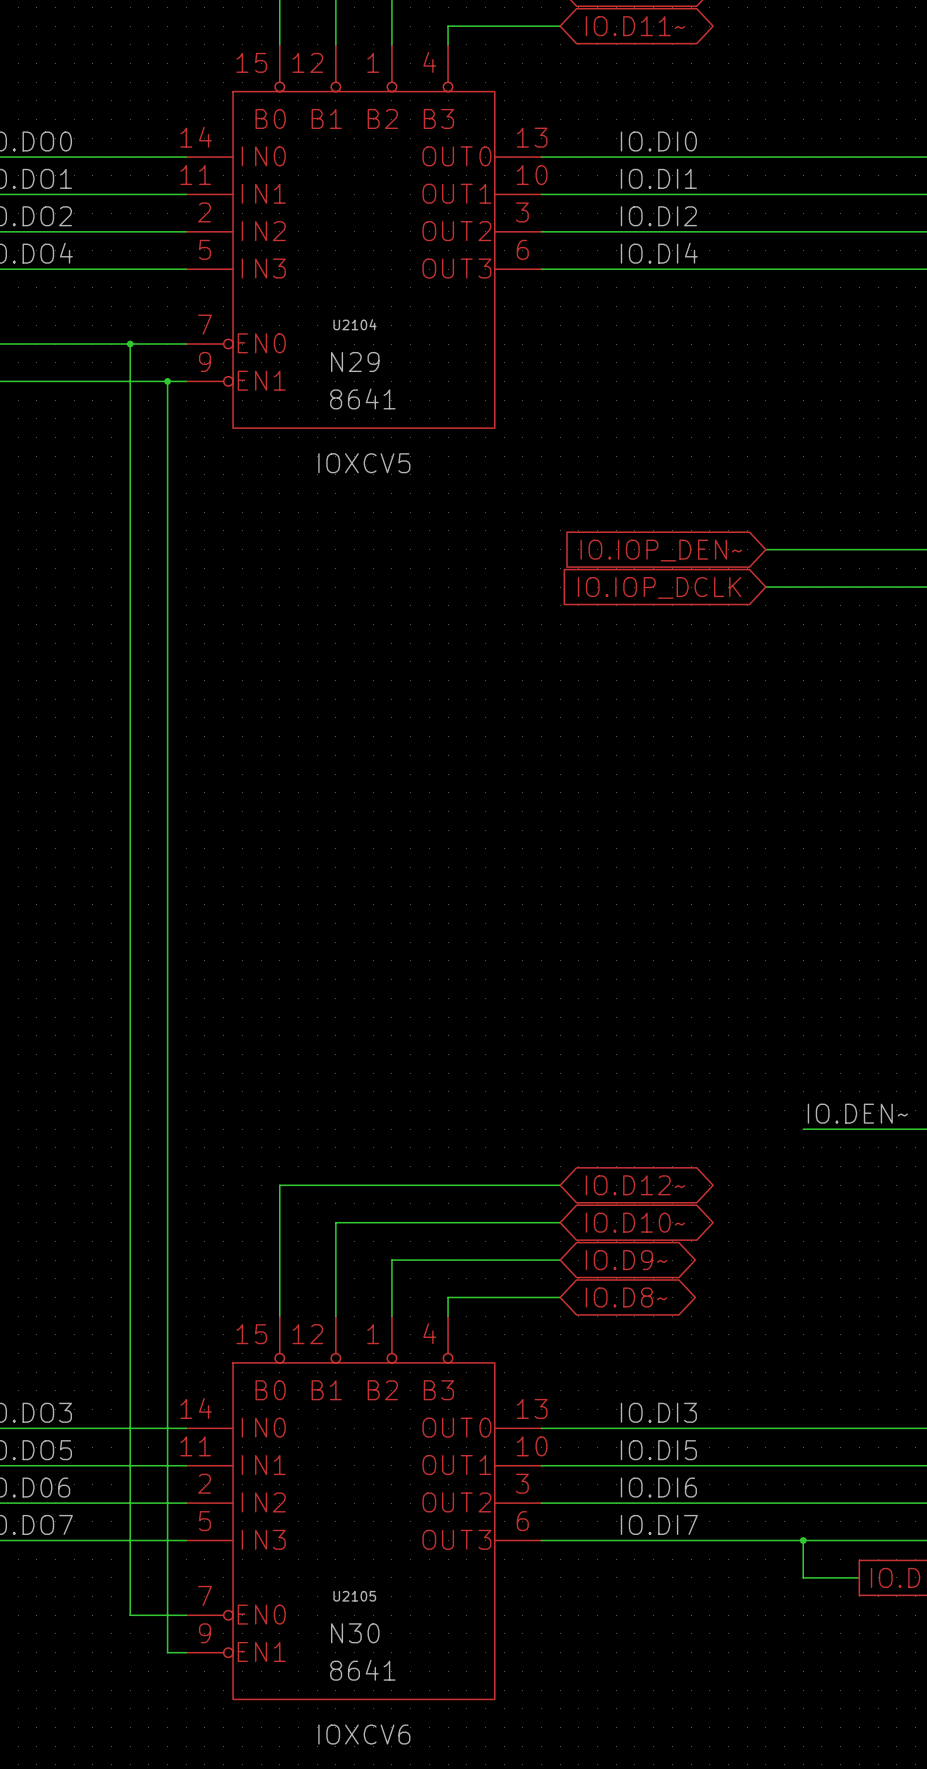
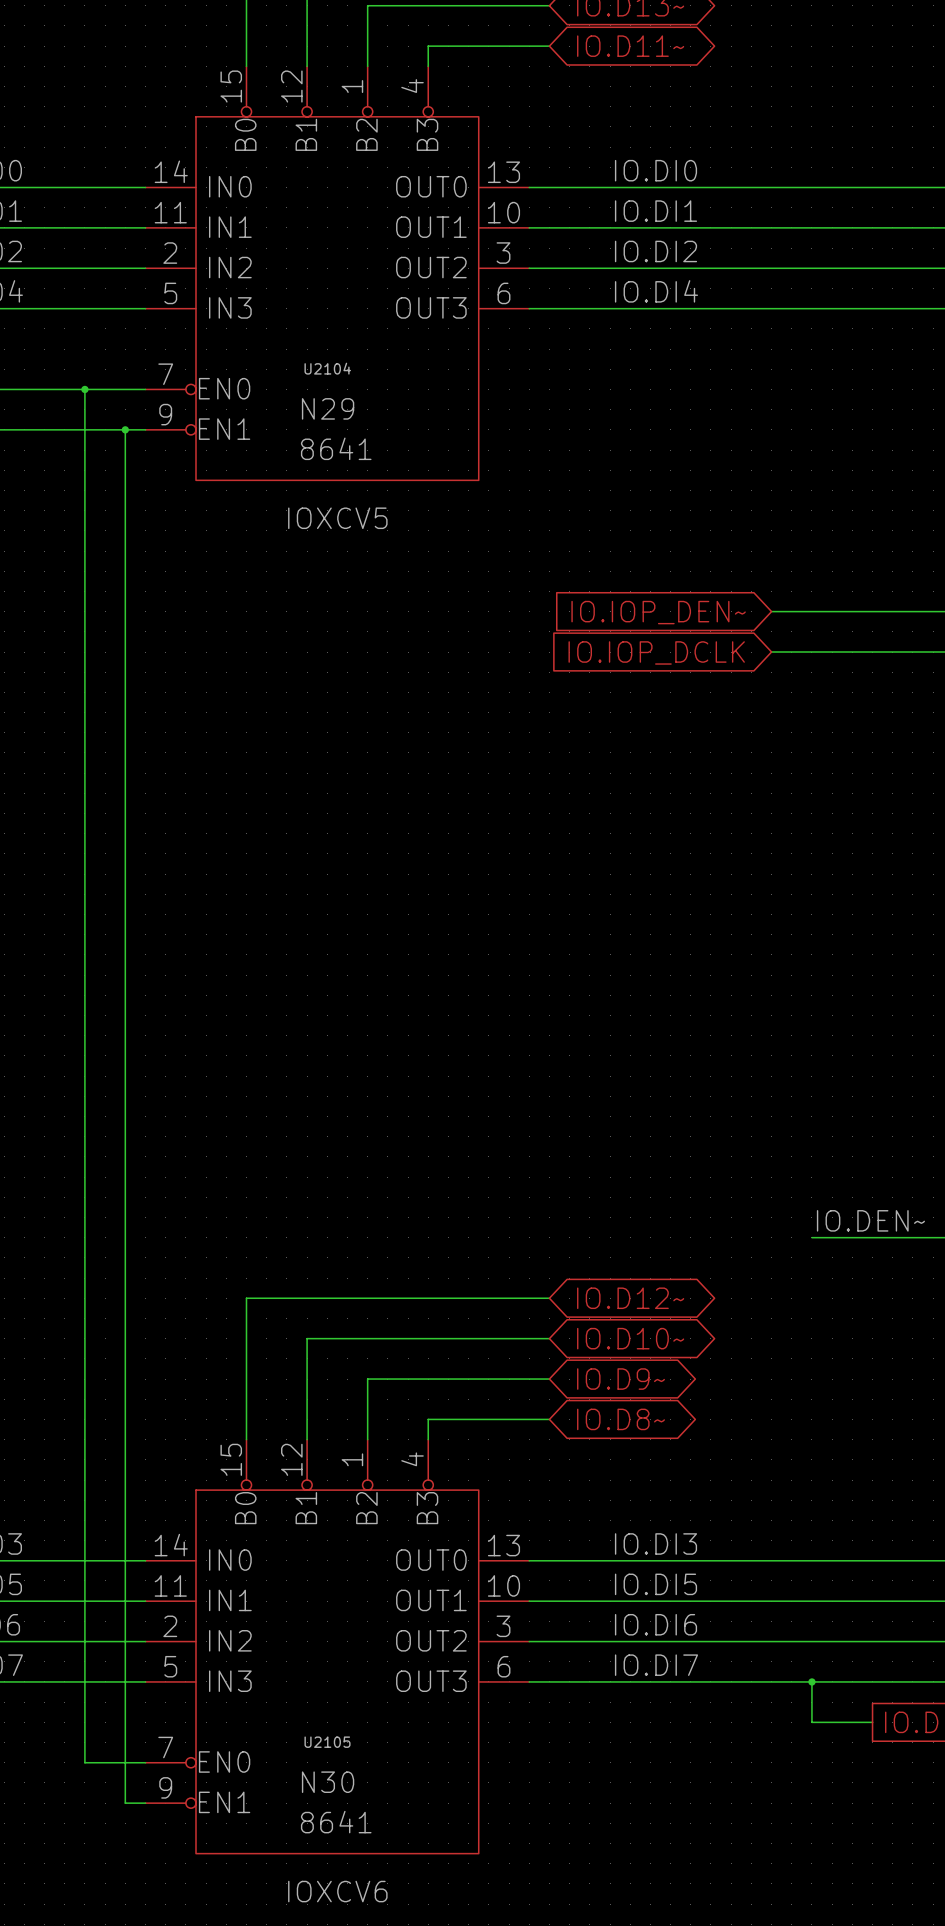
U2104 symbol: [186, 44, 542, 429] -> [145, 66, 530, 481]
U2105 symbol: [186, 1316, 542, 1700] -> [145, 1439, 530, 1854]

